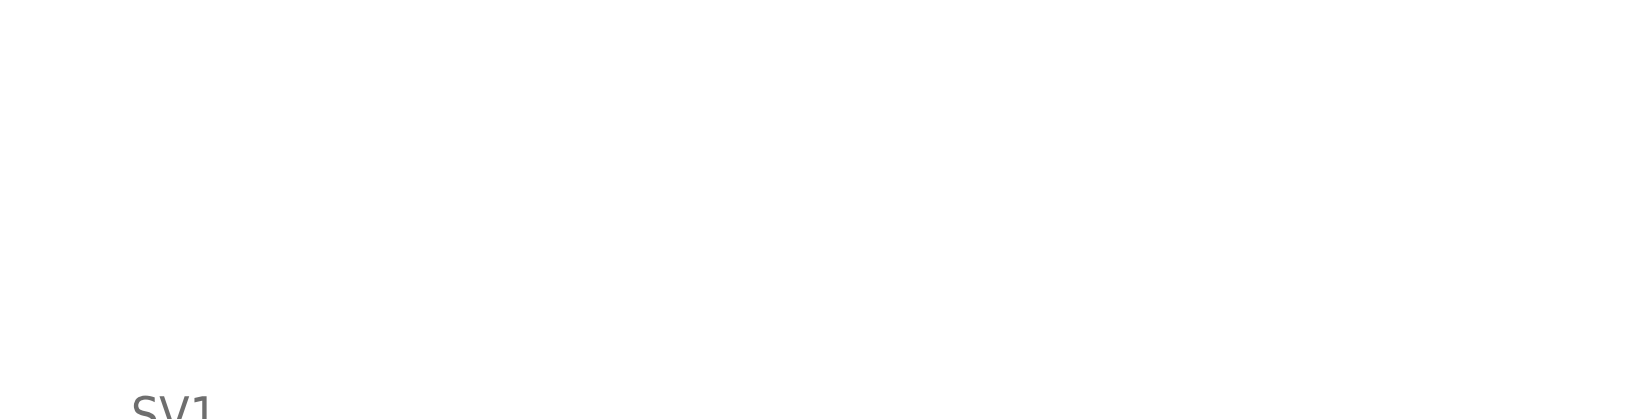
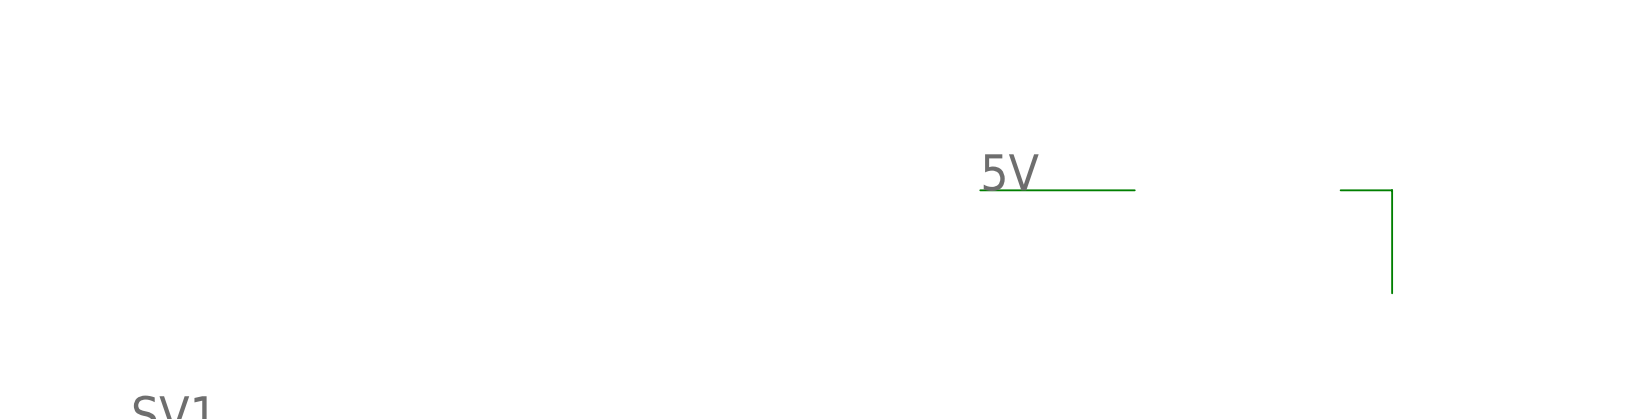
label: none -> 5V (1011, 172)
wire: none -> (980, 190) (1134, 190)
wire: none -> (1340, 190) (1392, 190) (1392, 293)

